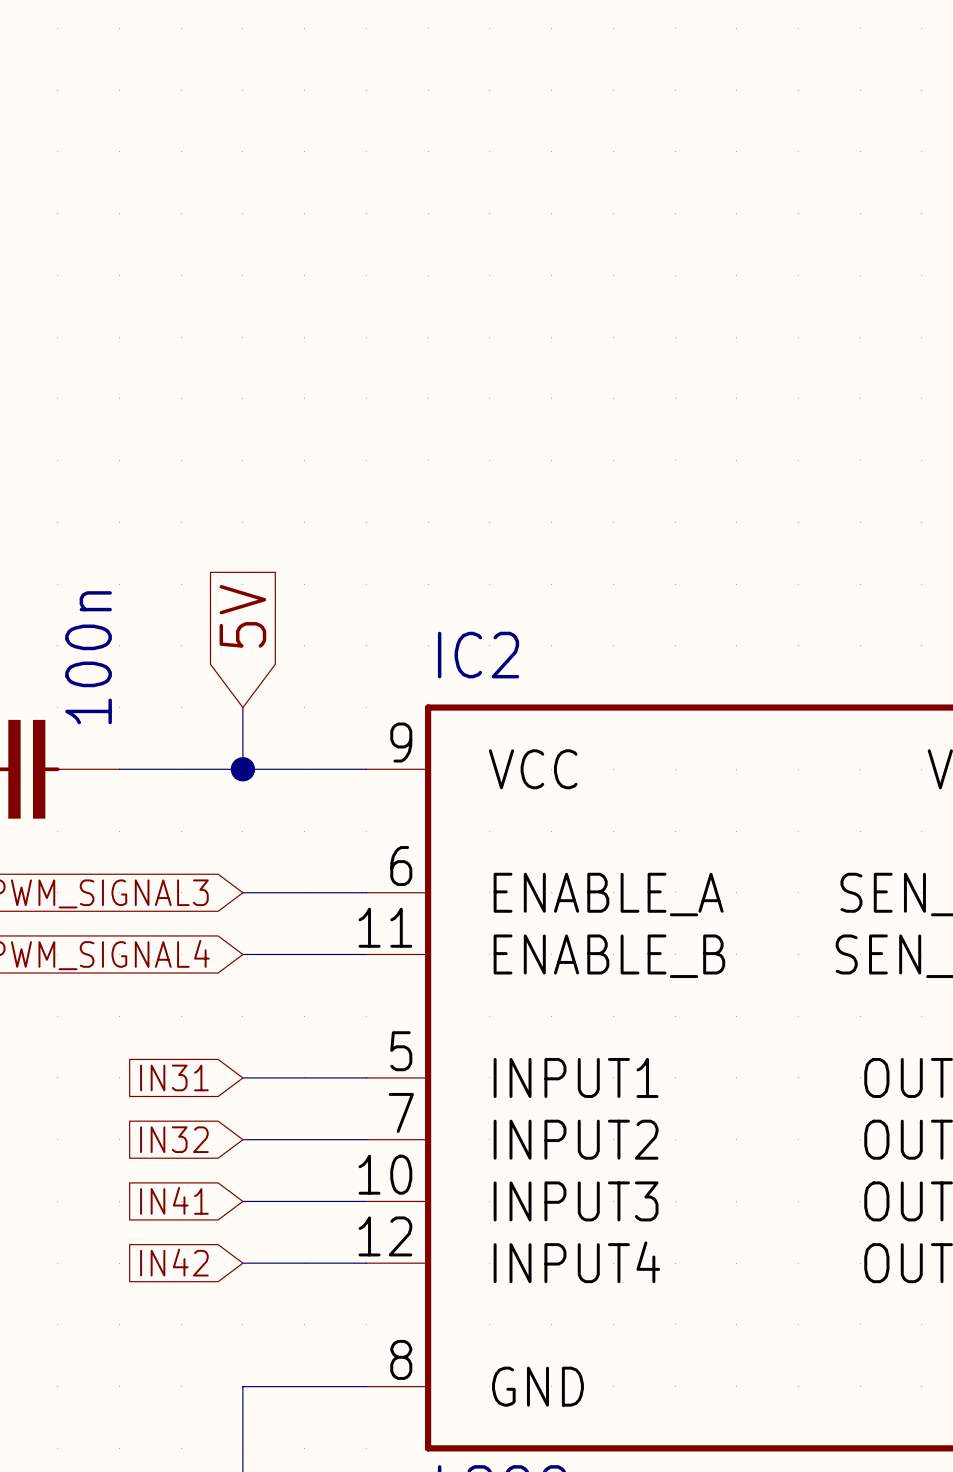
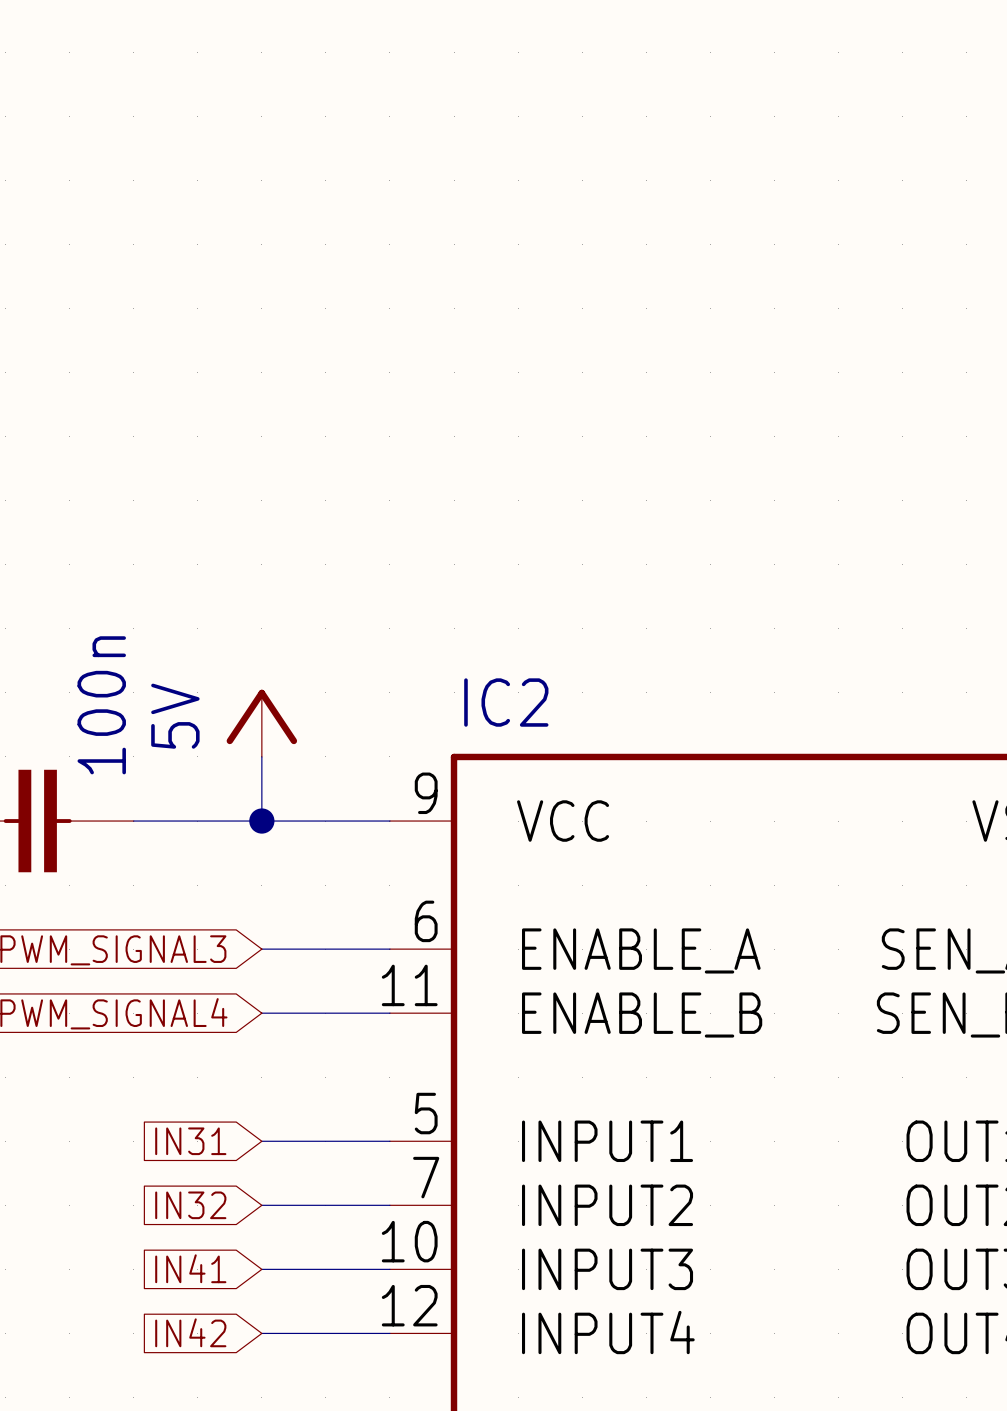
global label: 5V (242, 616) -> none
power symbol: none -> 5V (261, 723)

